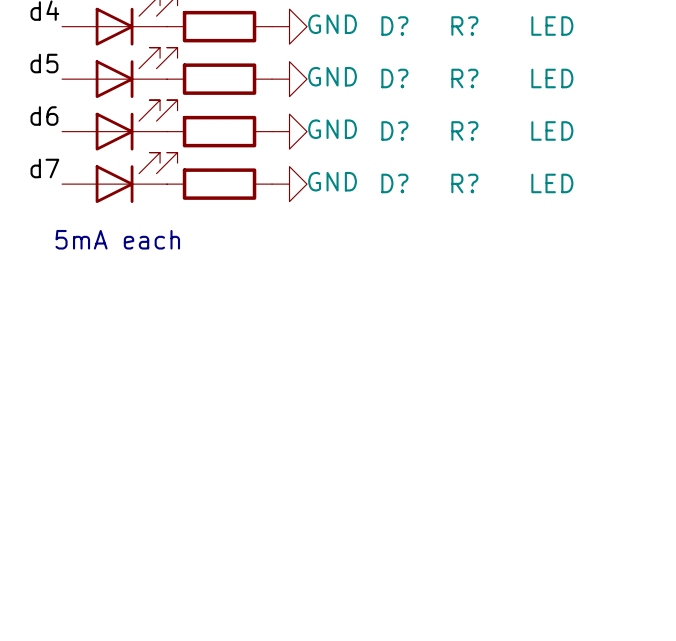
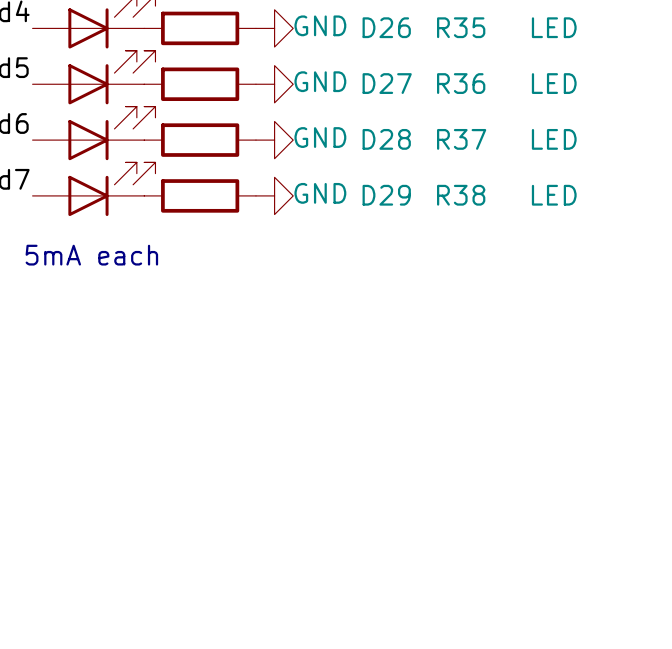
D? name: D? (394, 26) -> D26 (386, 27)
R? name: R? (464, 26) -> R35 (461, 27)
D? name: D? (394, 78) -> D27 (387, 83)
R? name: R? (464, 78) -> R36 (461, 83)
D? name: D? (394, 130) -> D28 (386, 139)
R? name: R? (464, 130) -> R37 (461, 139)
D? name: D? (394, 183) -> D29 (386, 195)
R? name: R? (464, 183) -> R38 (461, 195)

